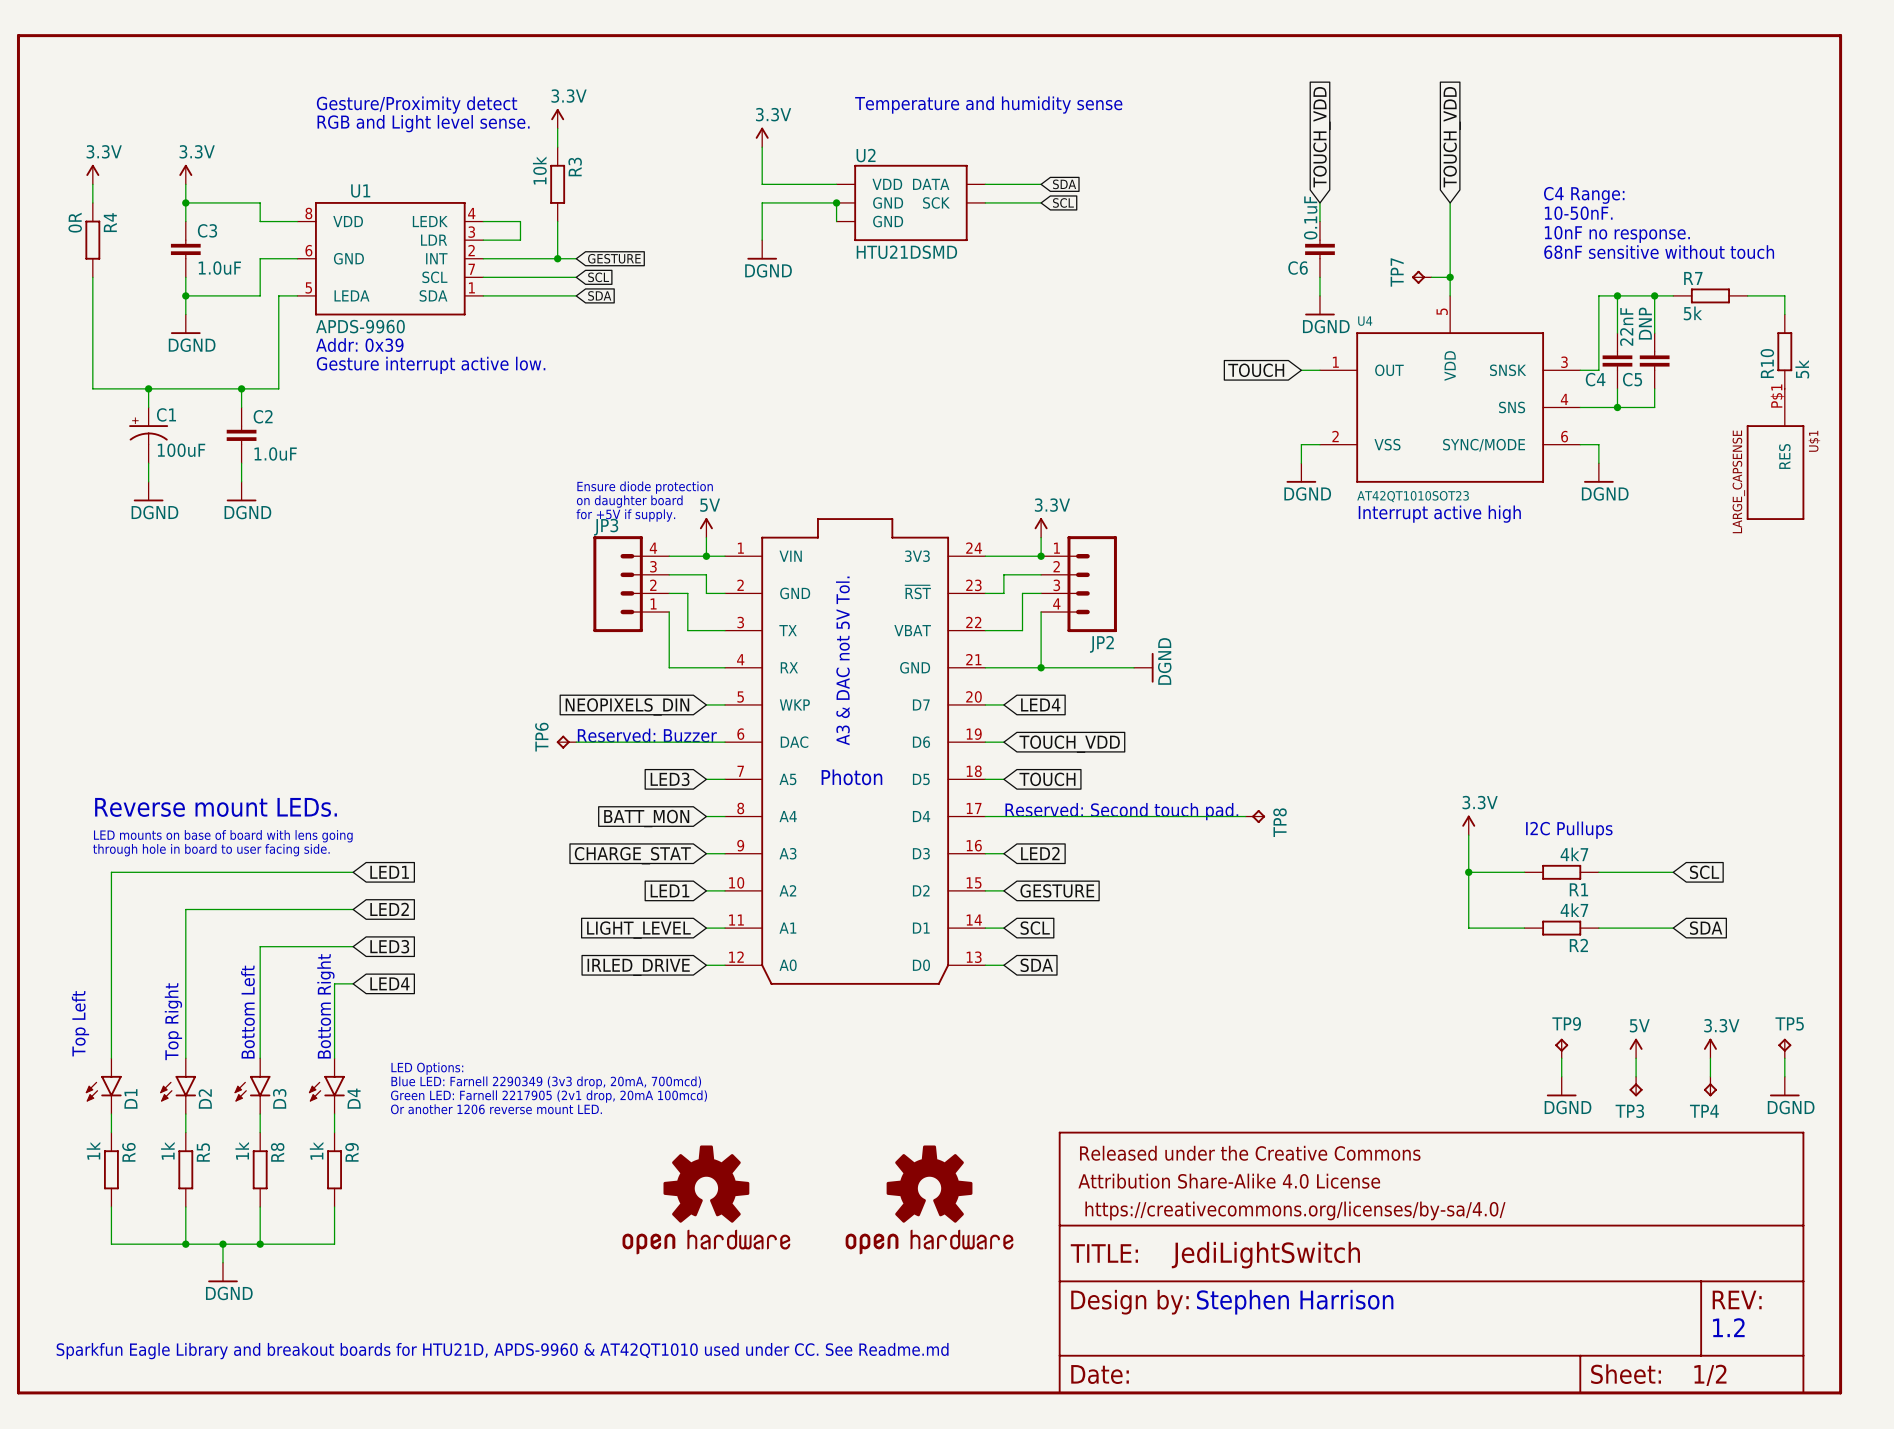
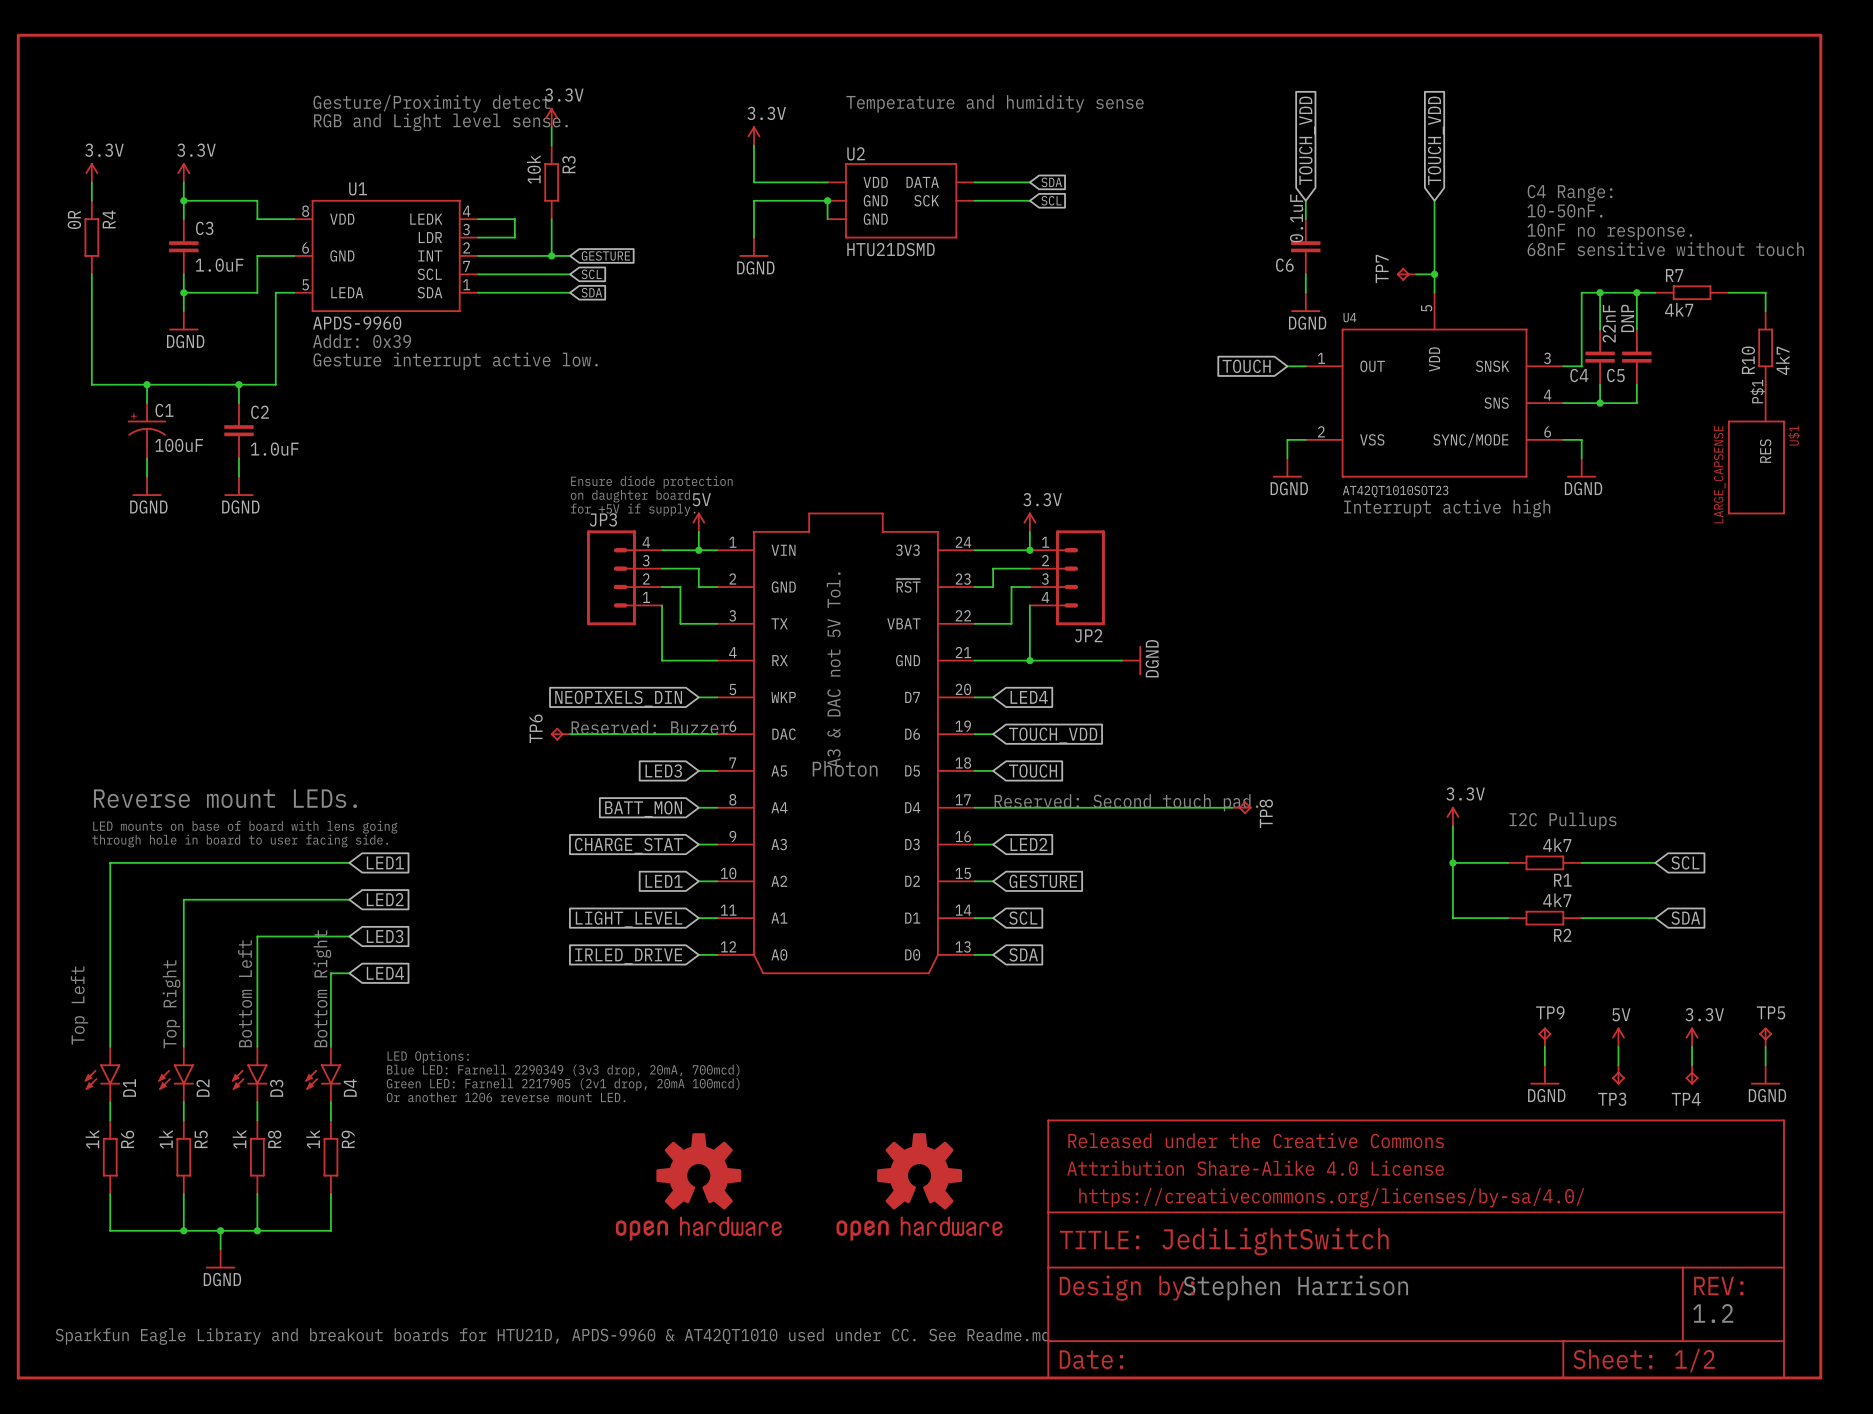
R7 value: 5k (1692, 313) -> 4k7 (1679, 309)
R10 value: 5k (1802, 369) -> 4k7 (1782, 360)

